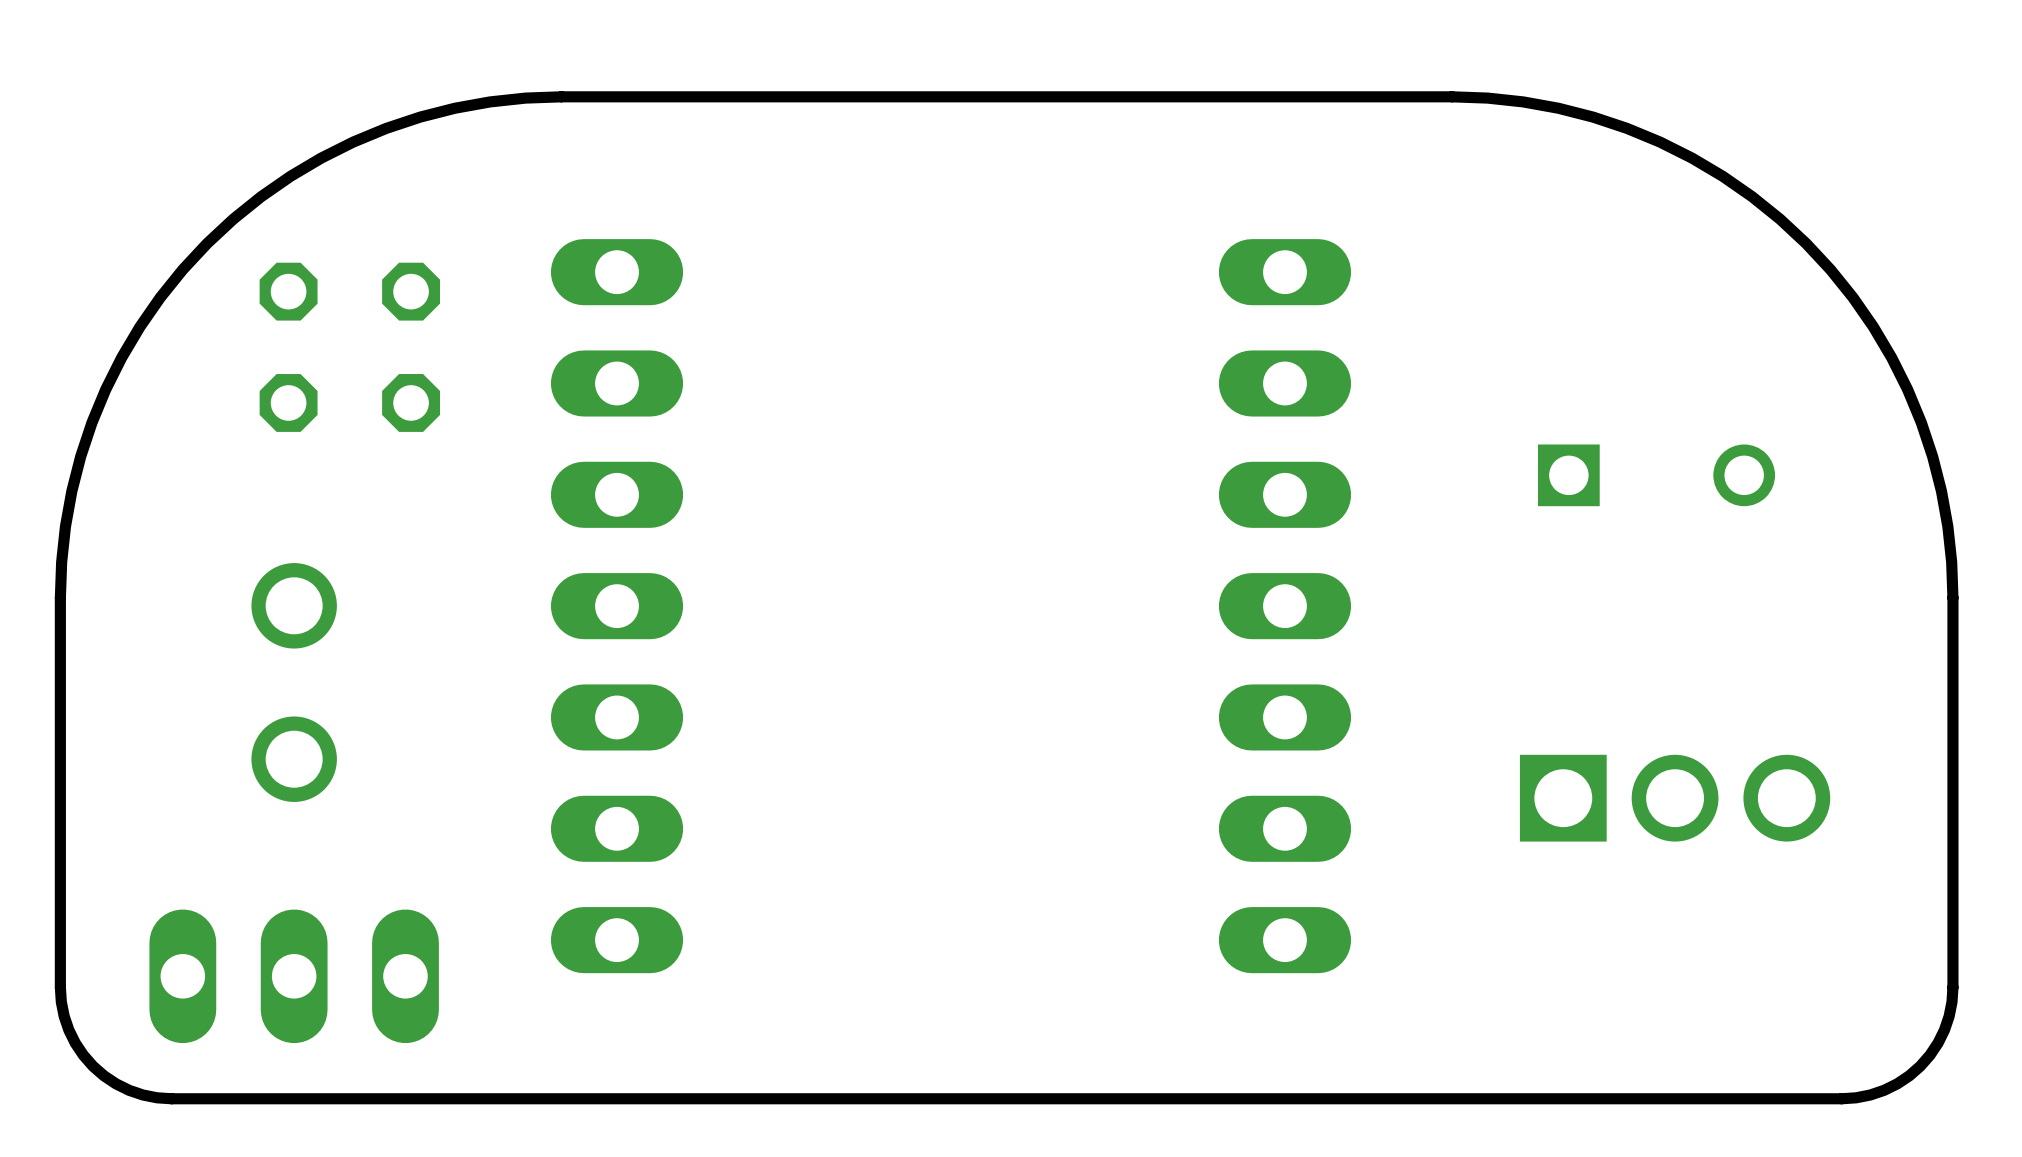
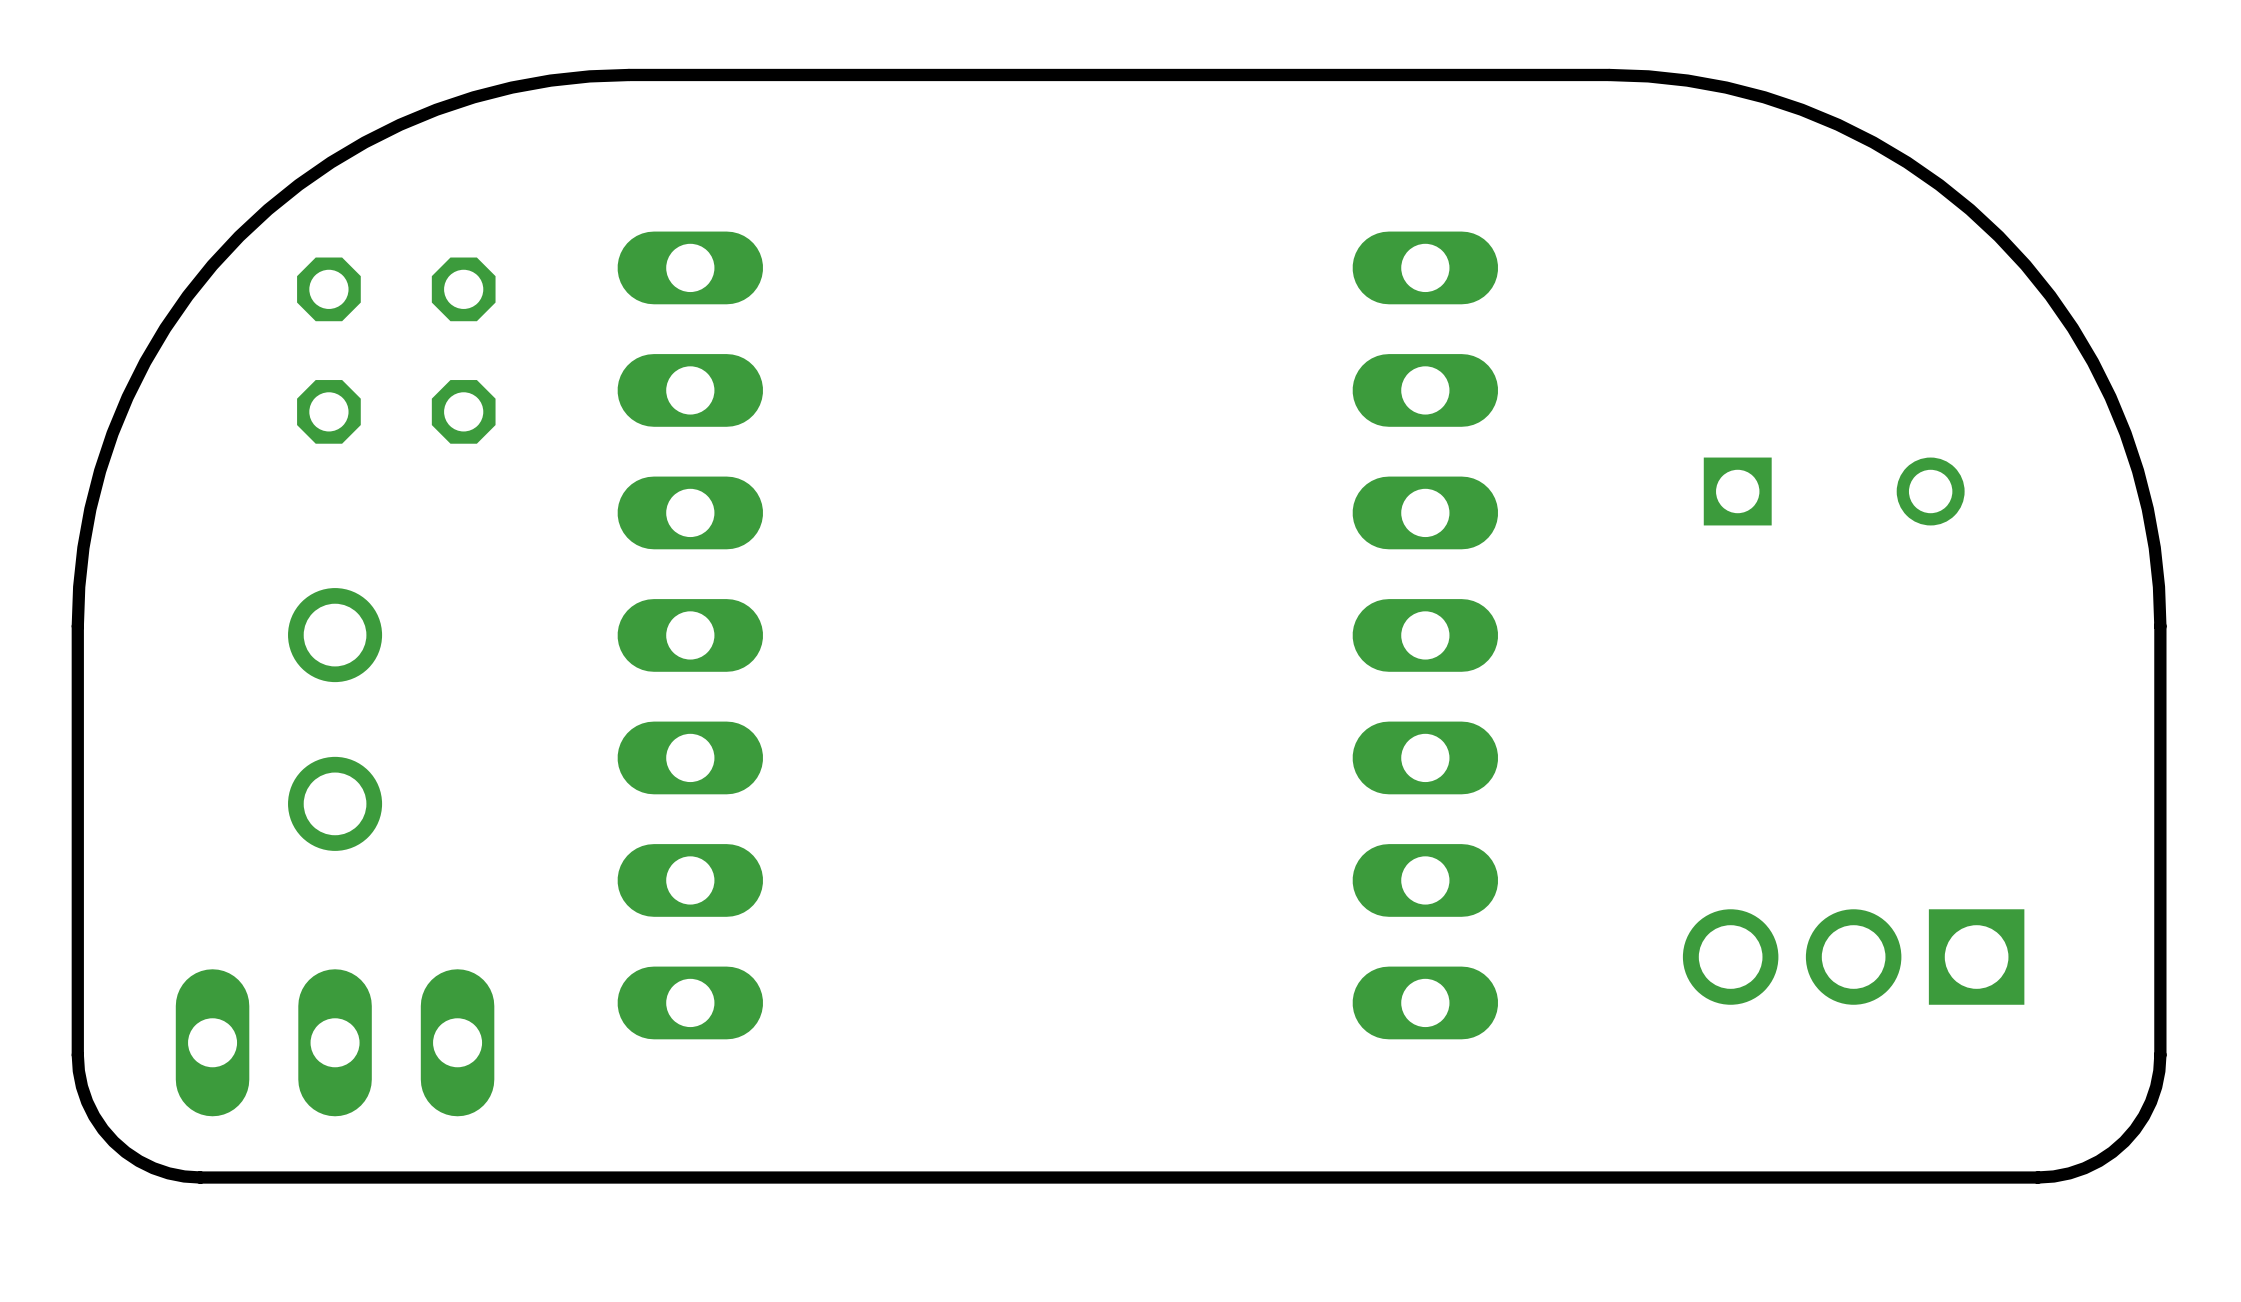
part rotation: 0° (1675, 798) -> 180° (1853, 957)

